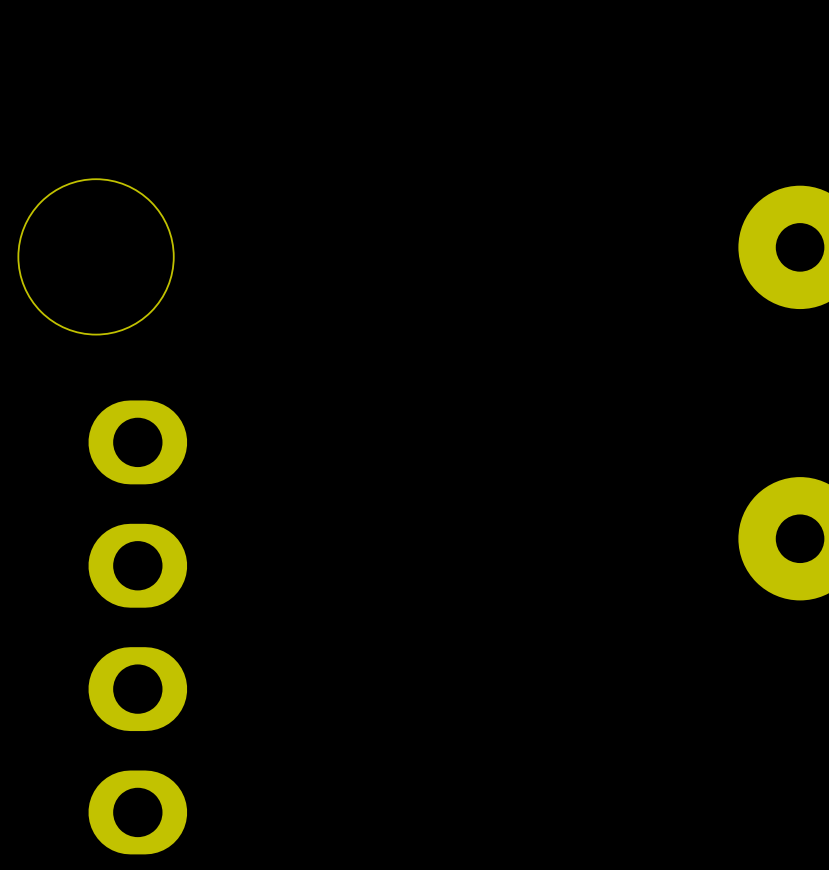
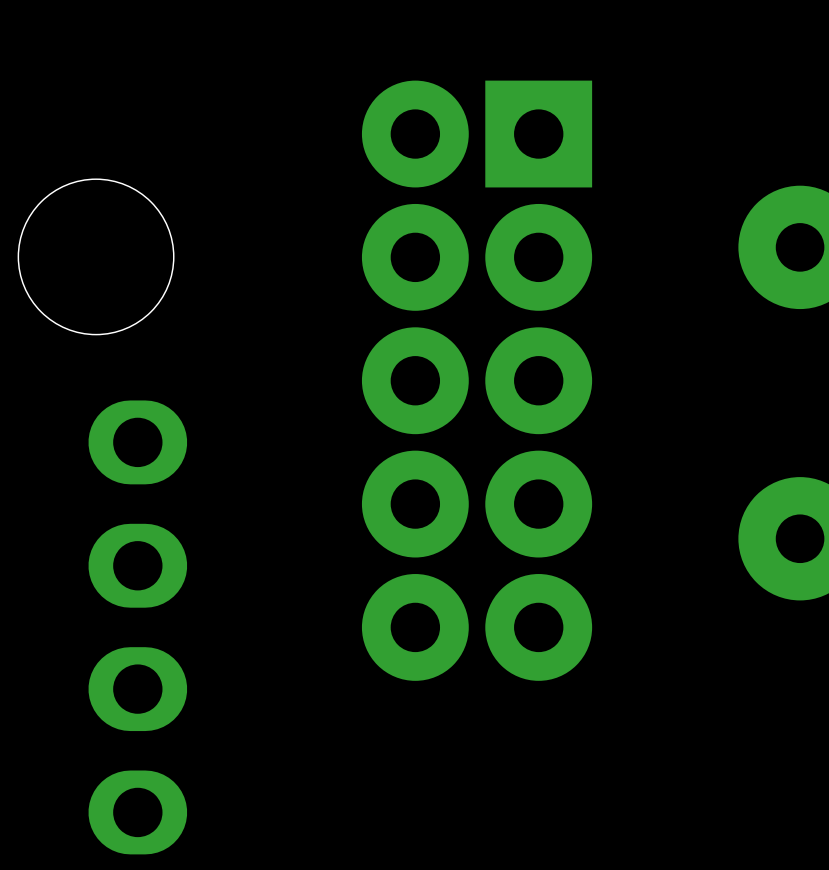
part: none -> (477, 380)

